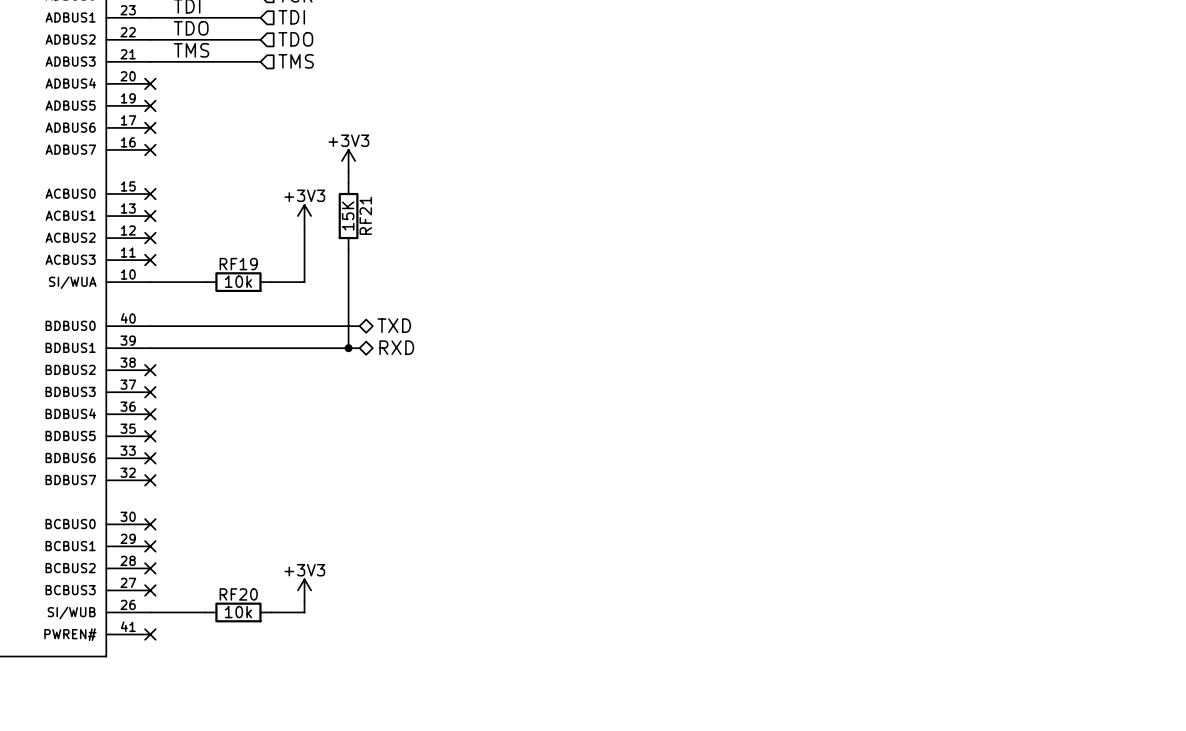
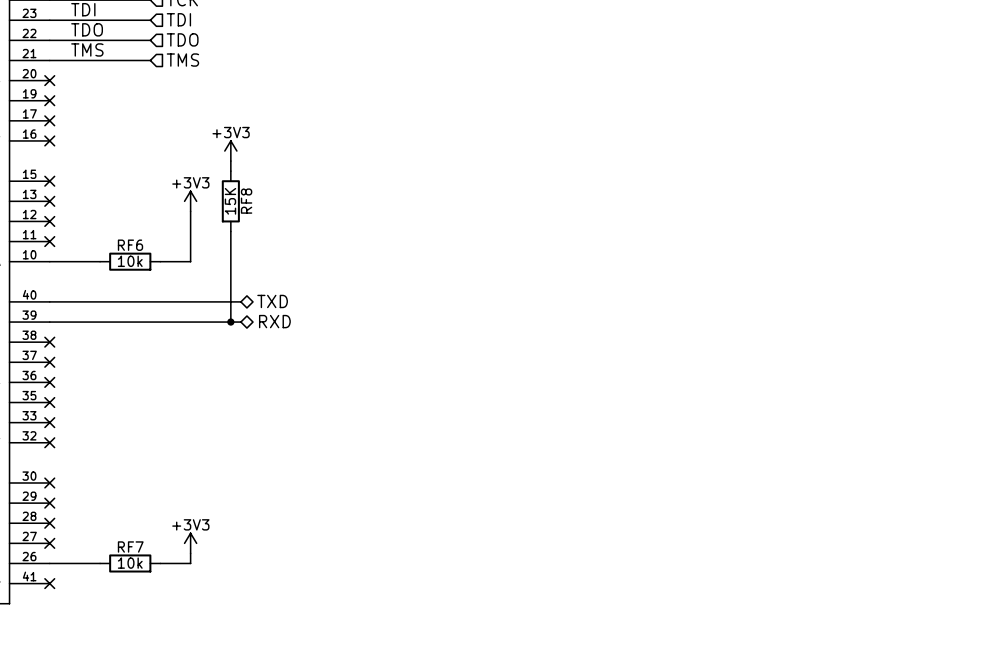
RF21 name: RF21 (365, 215) -> RF8 (246, 201)
RF19 name: RF19 (238, 264) -> RF6 (130, 245)
RF20 name: RF20 (238, 594) -> RF7 (130, 547)

